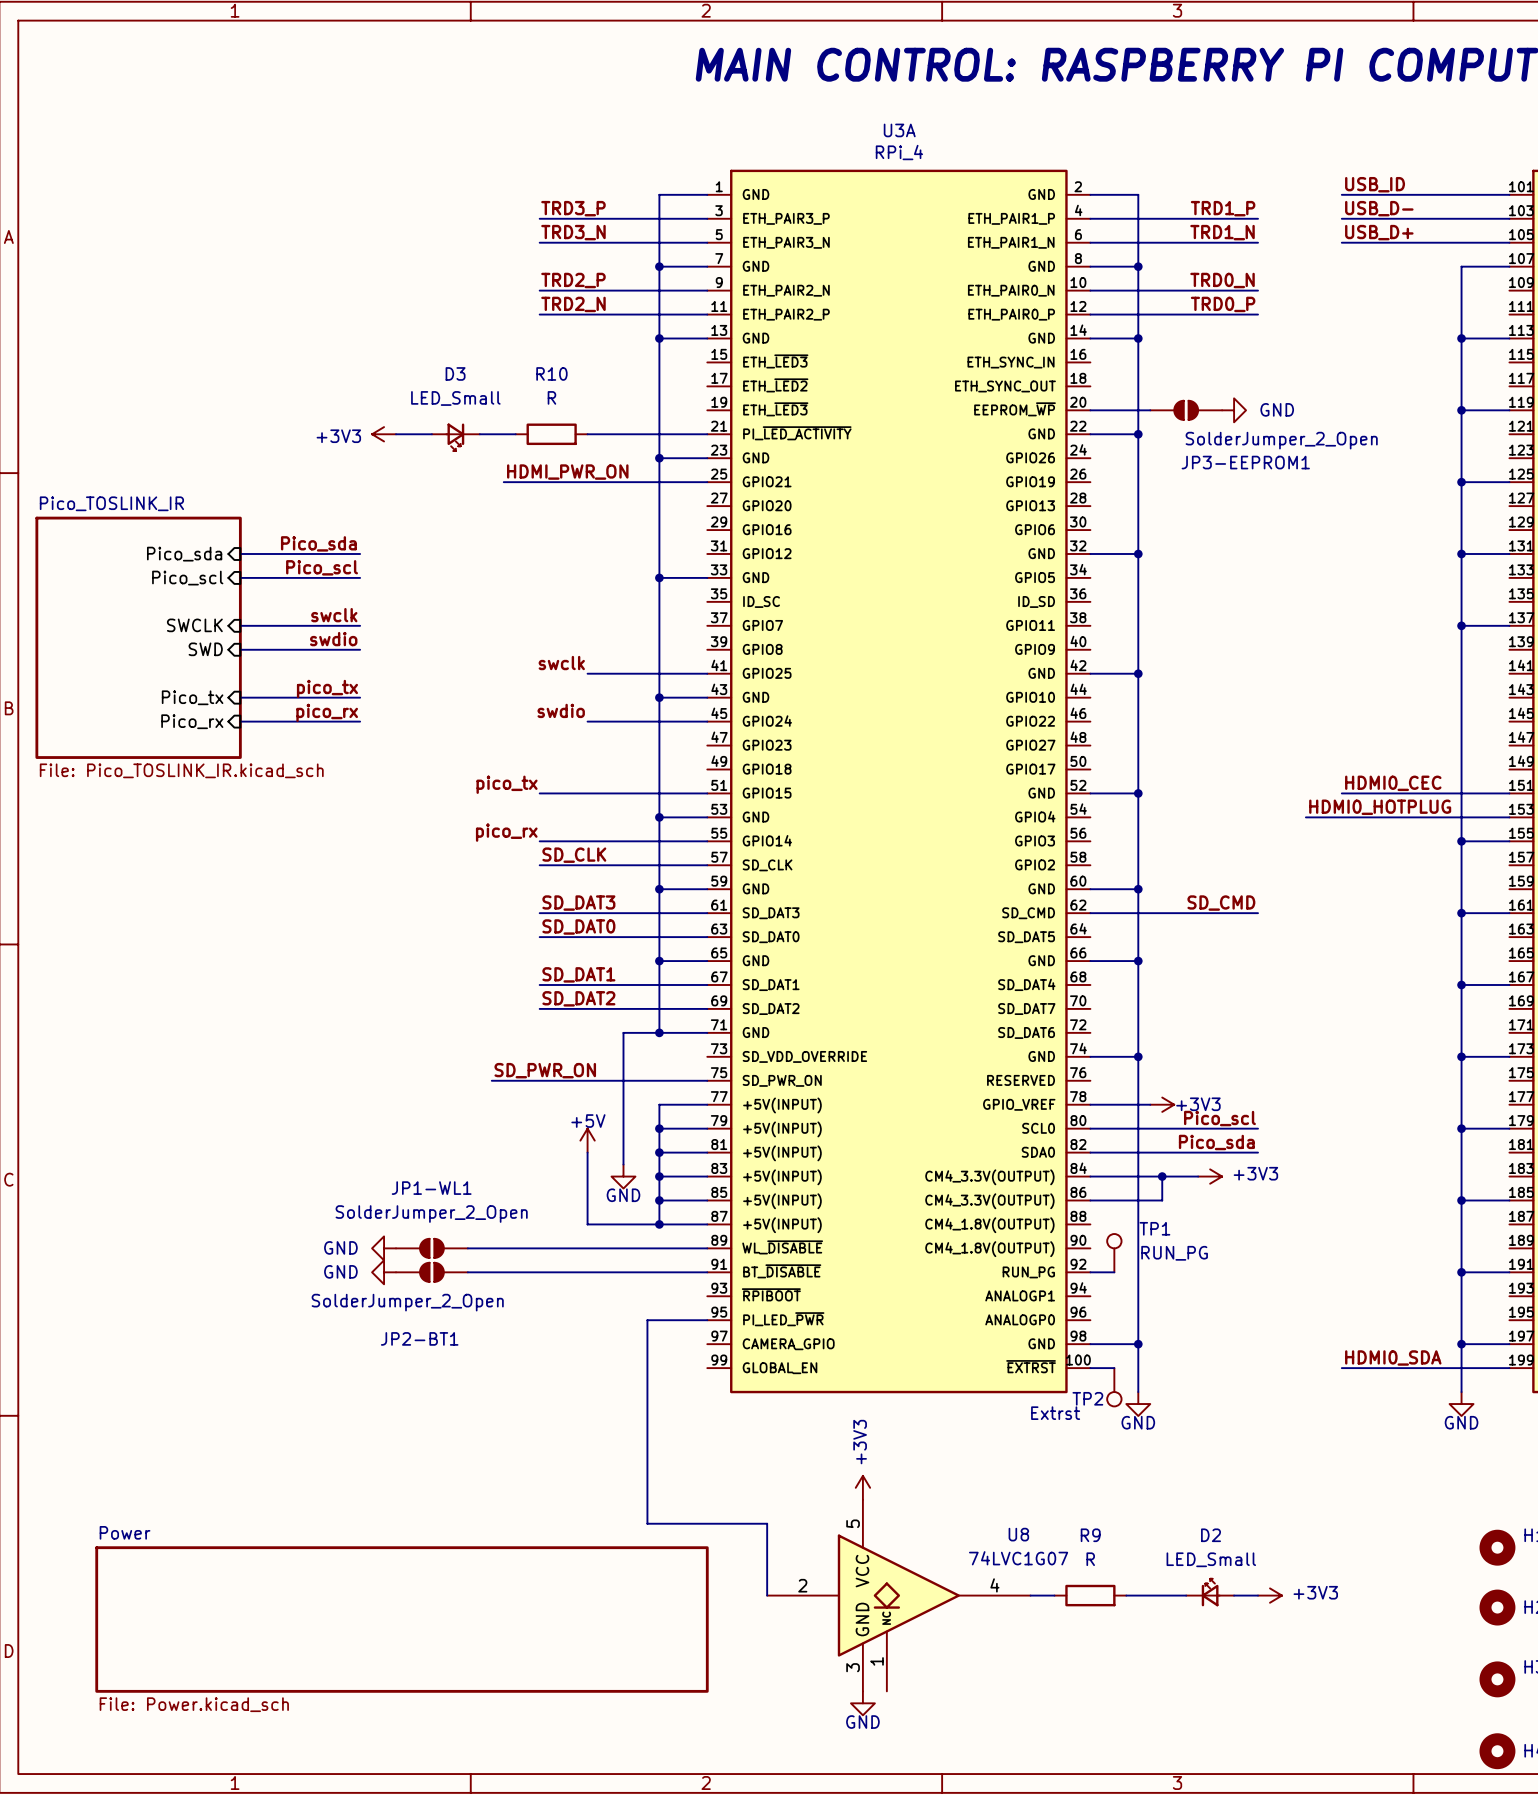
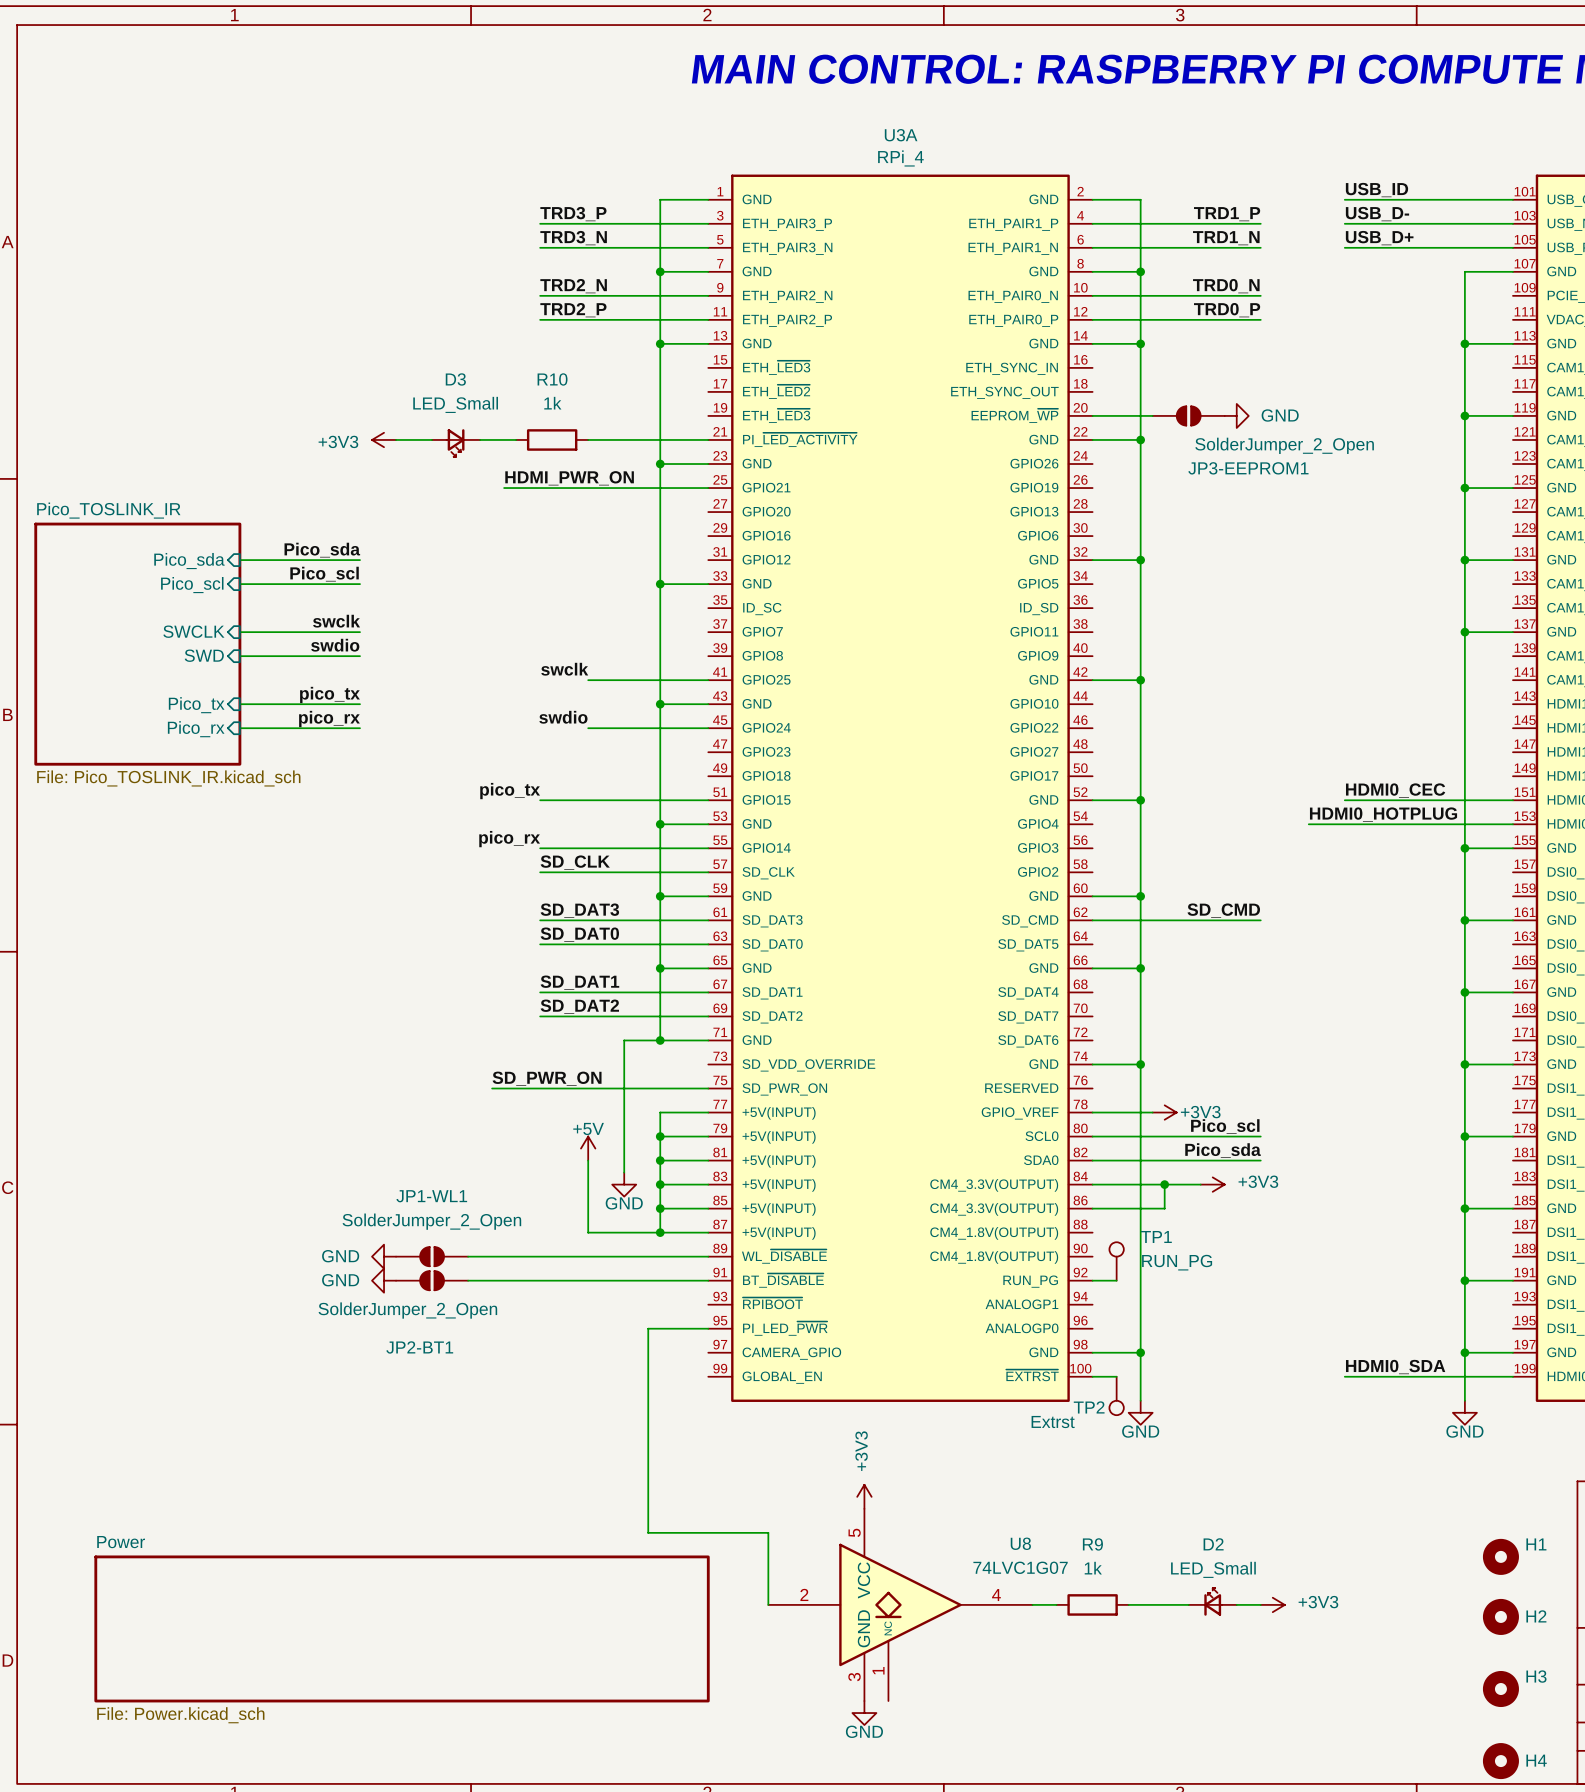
label: TRD2_P (573, 280) -> TRD2_N (573, 286)
label: TRD2_N (573, 304) -> TRD2_P (573, 310)
R10 value: R (551, 397) -> 1k (552, 403)
R9 value: R (1090, 1559) -> 1k (1093, 1568)

